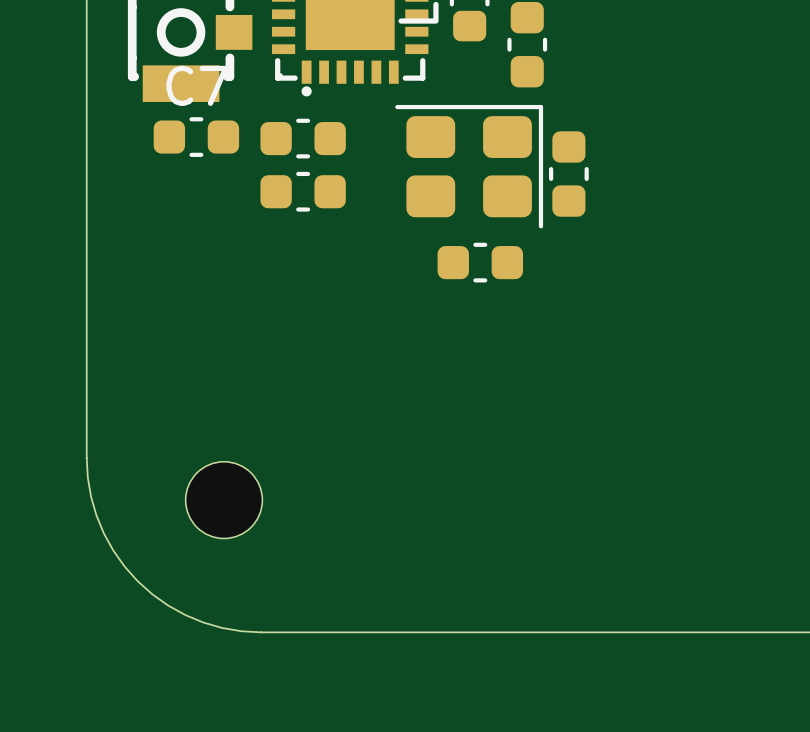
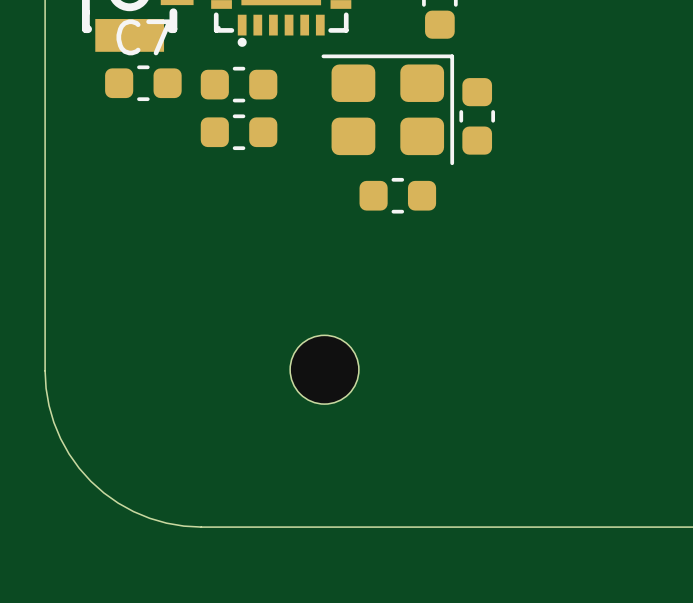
part position: (224, 500) -> (324, 369)

